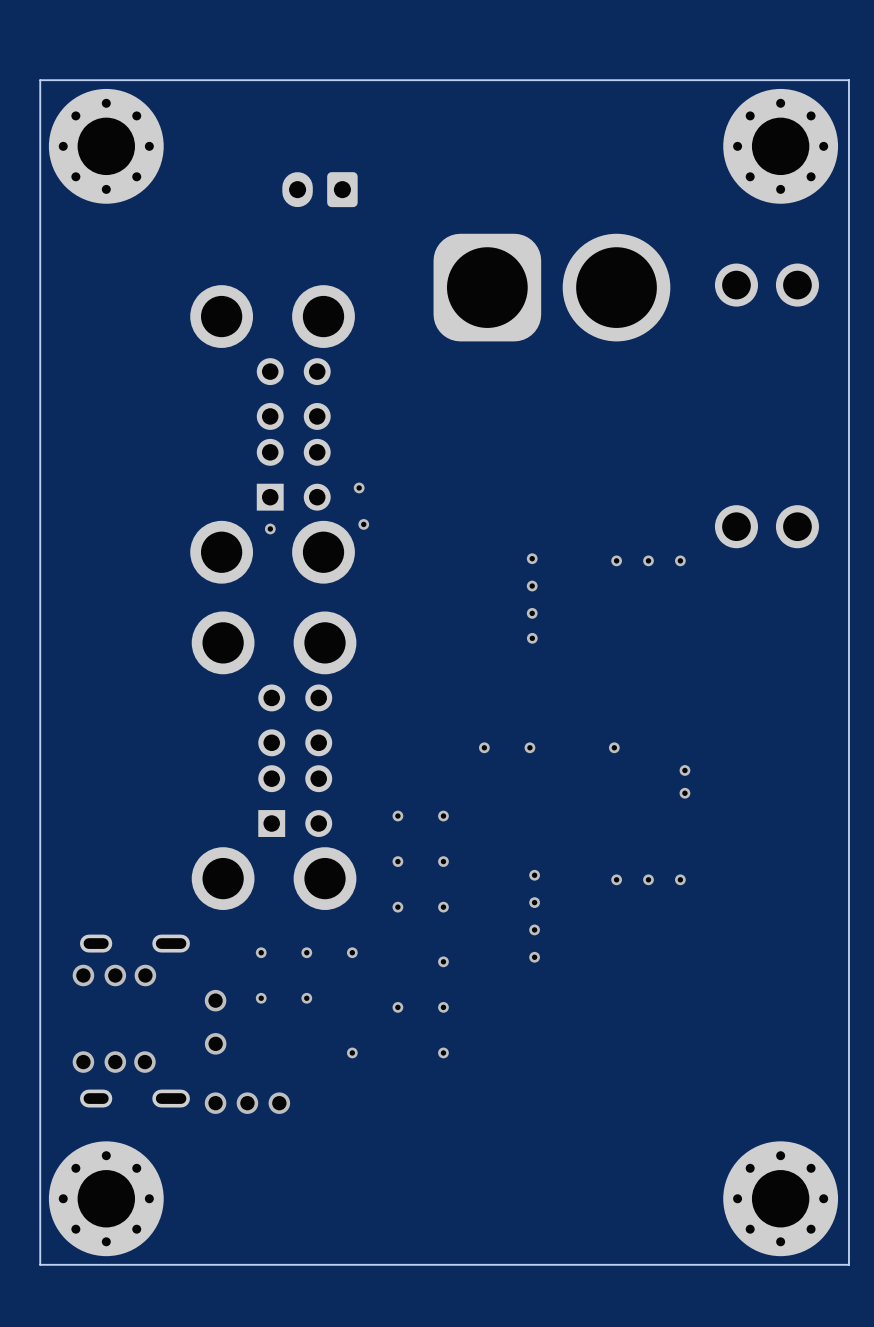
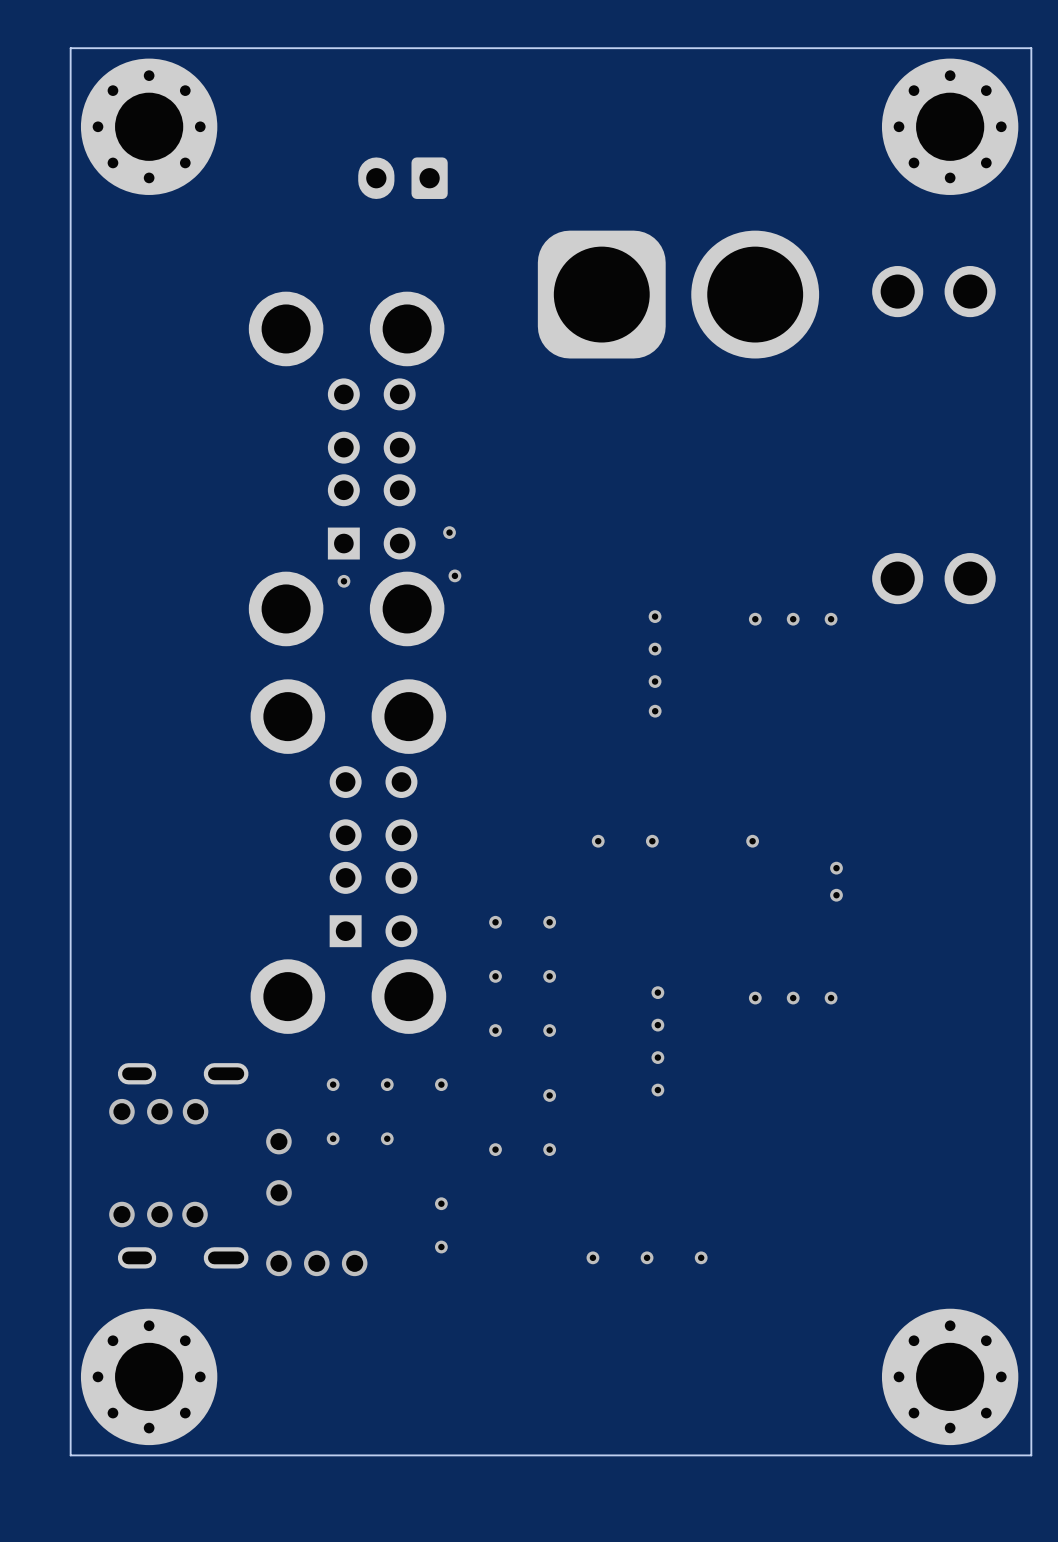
via: (443, 1052) -> none
via: none -> (441, 1247)
via: none -> (592, 1257)
via: none -> (647, 1257)
via: none -> (701, 1257)

